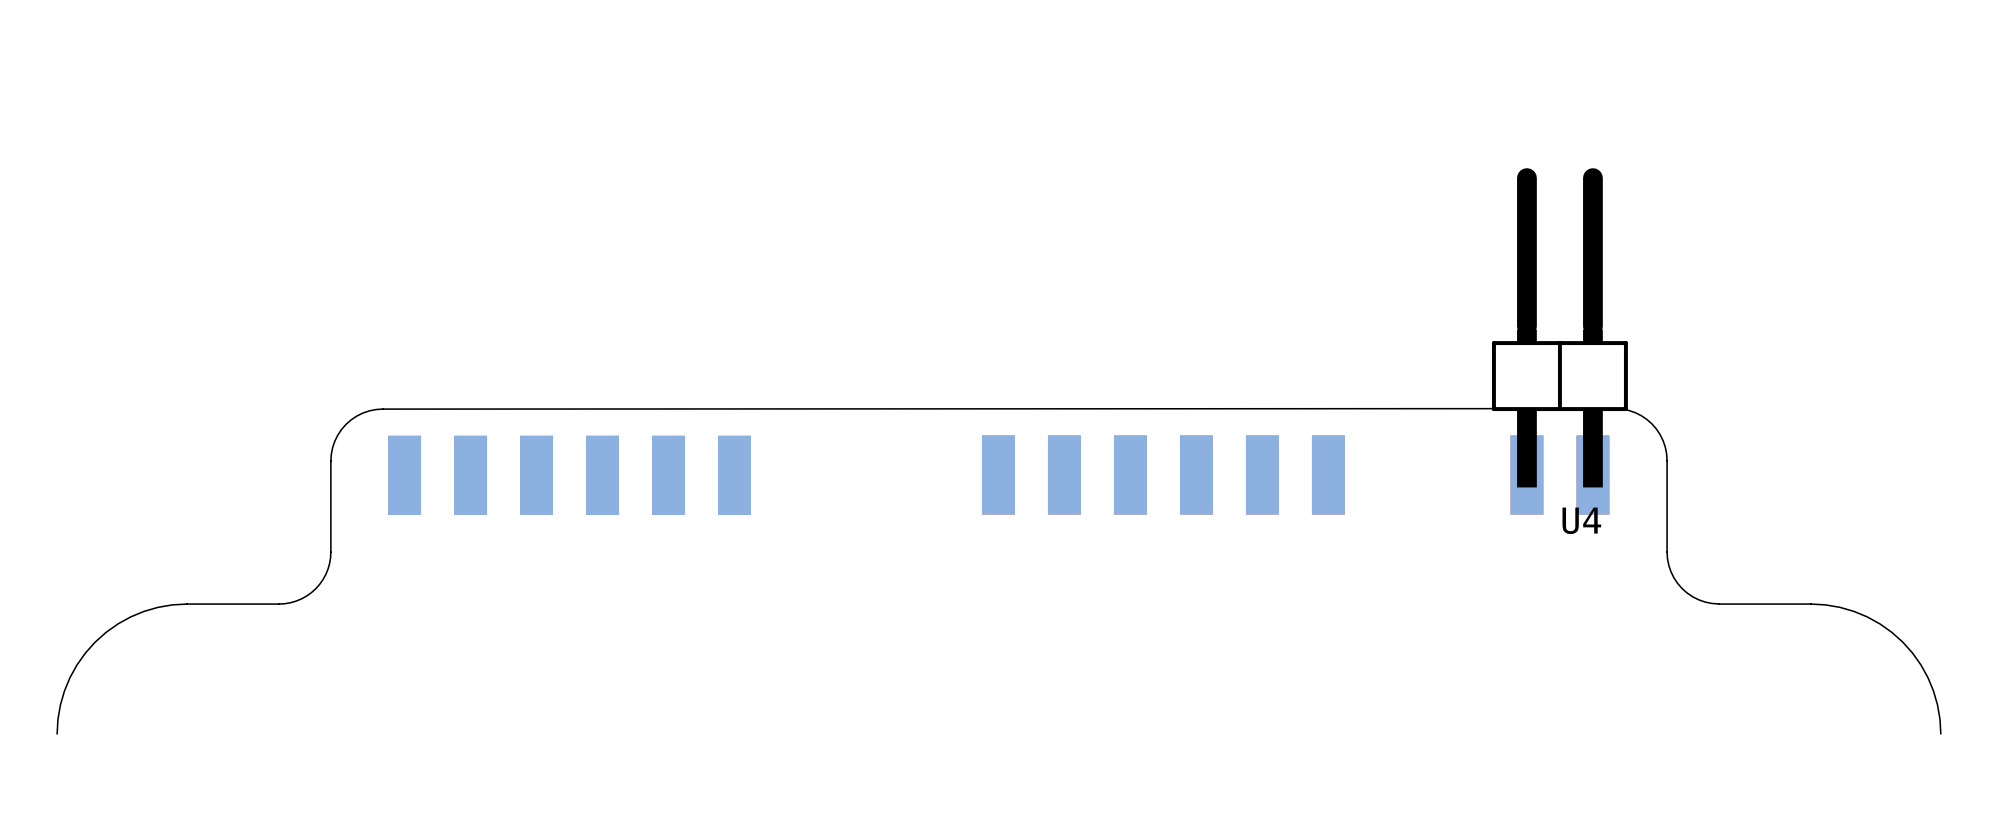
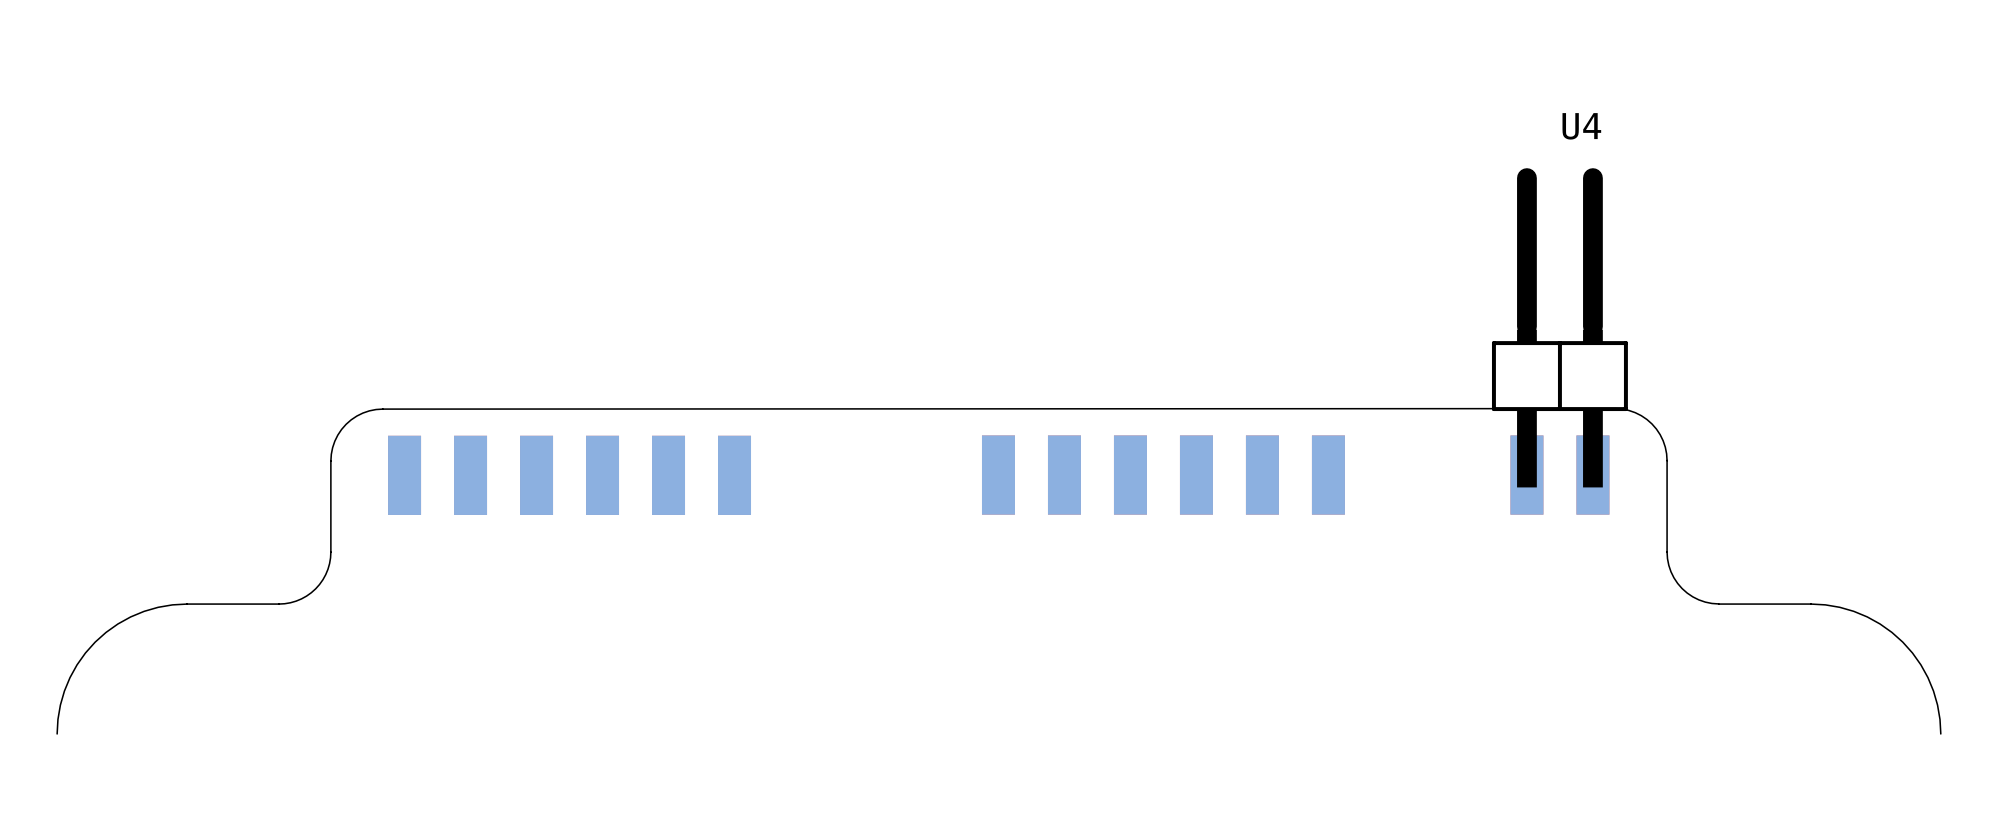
U4 name position: U4 (1581, 520) -> U4 (1581, 126)

